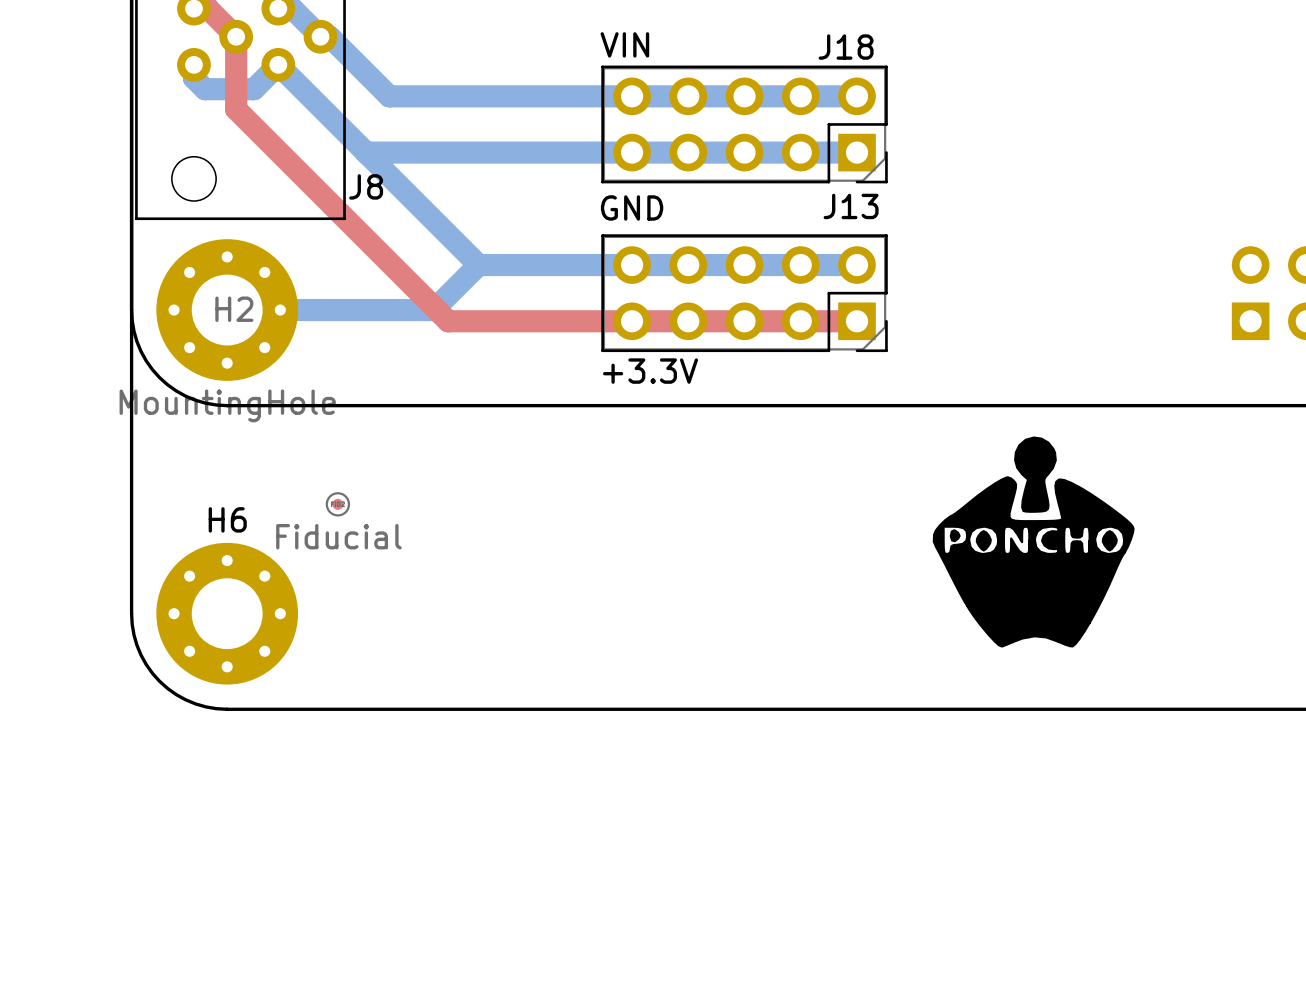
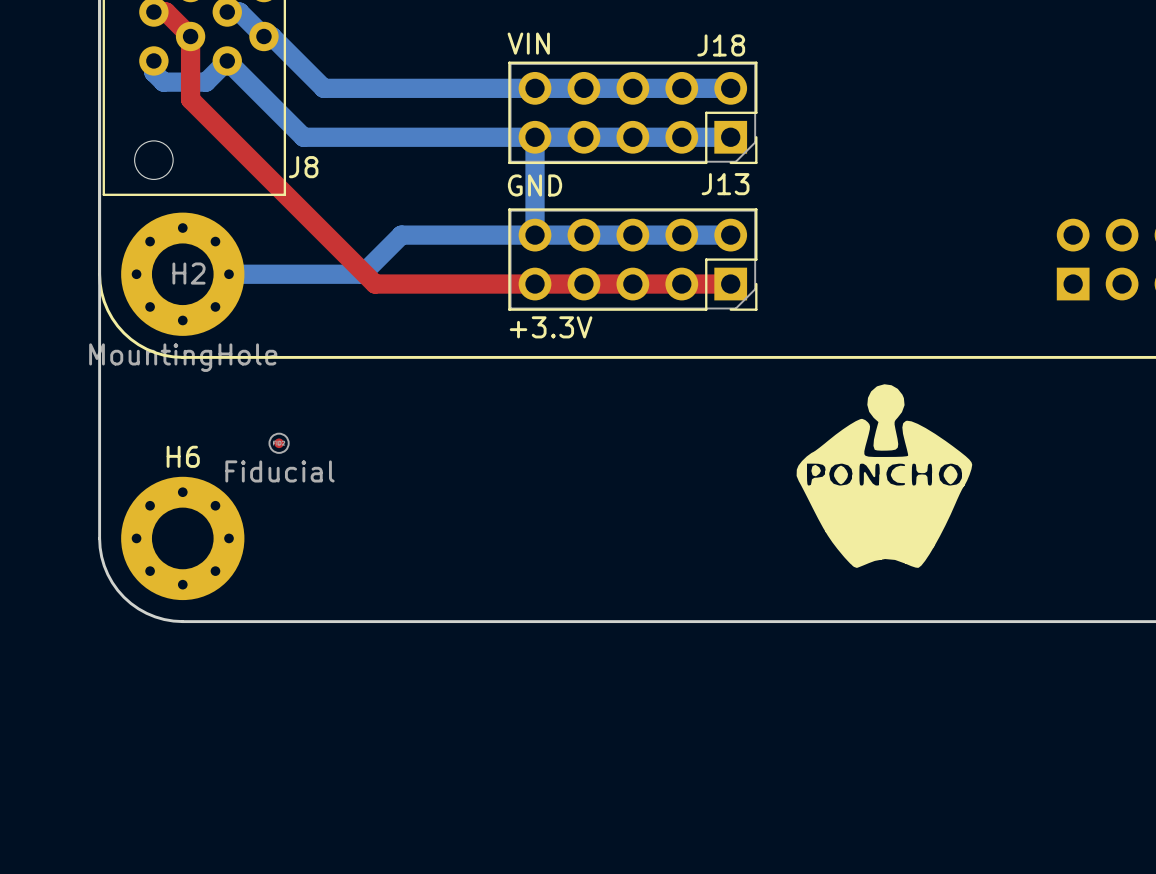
bottom track: (366, 152) (478, 265) -> none
bottom track: none -> (535, 137) (535, 235)

